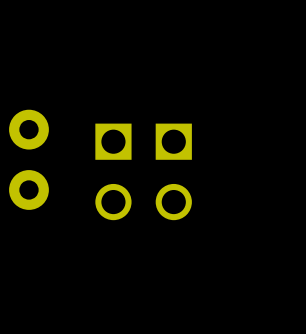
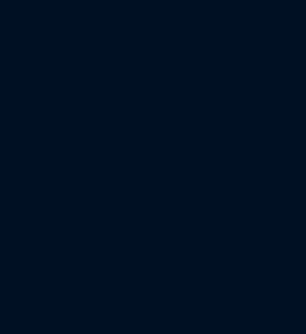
part: (28, 159) -> none
part: (113, 171) -> none
part: (173, 171) -> none

